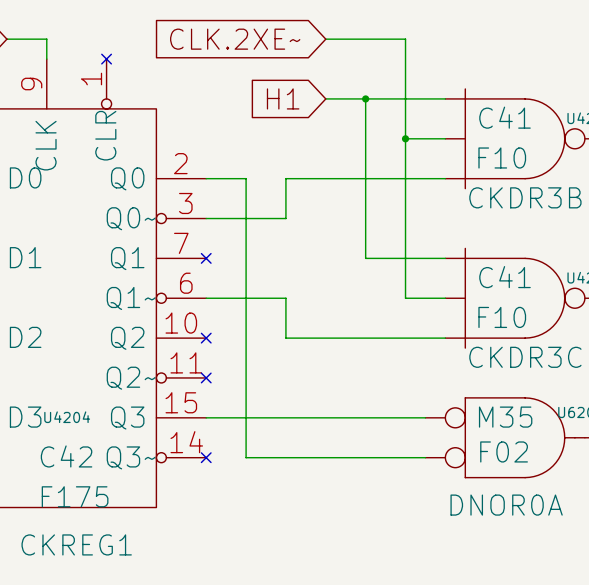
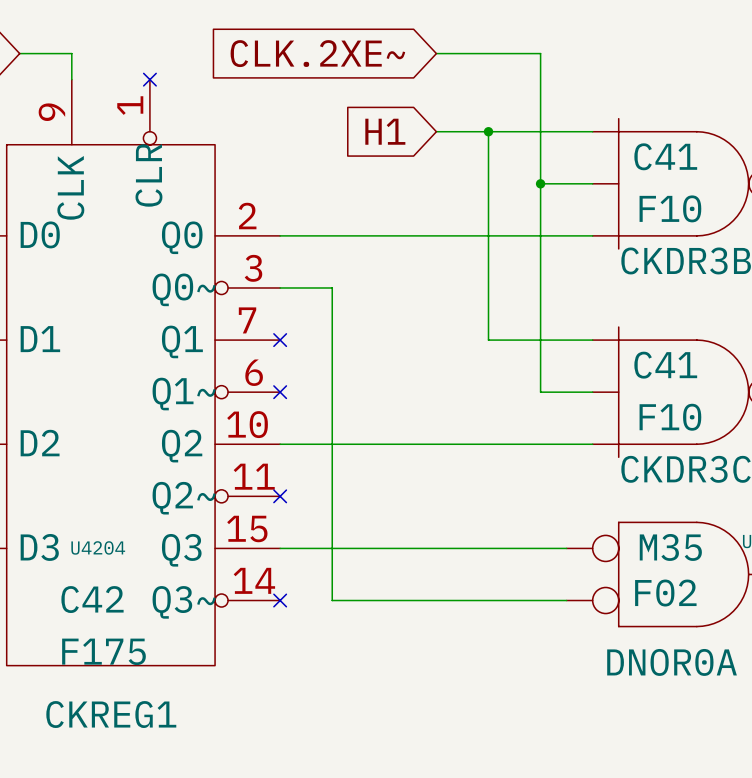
wire: (246, 178) (246, 218) (285, 218) (285, 178) -> (332, 235) (384, 235)
wire: (206, 298) (285, 298) (285, 338) -> (280, 444) (384, 444)
no-connect mark position: (206, 338) -> (280, 392)

